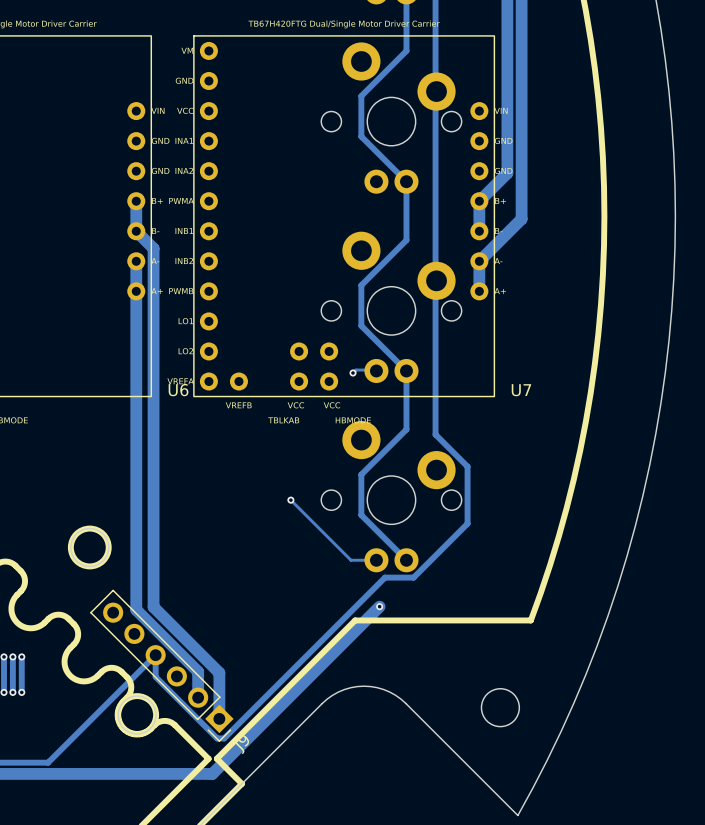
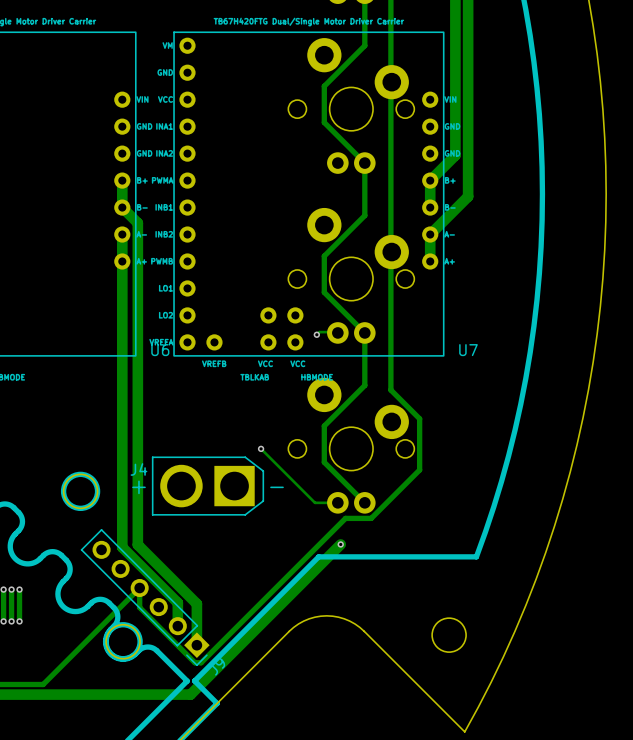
J4: none -> (207, 486)

